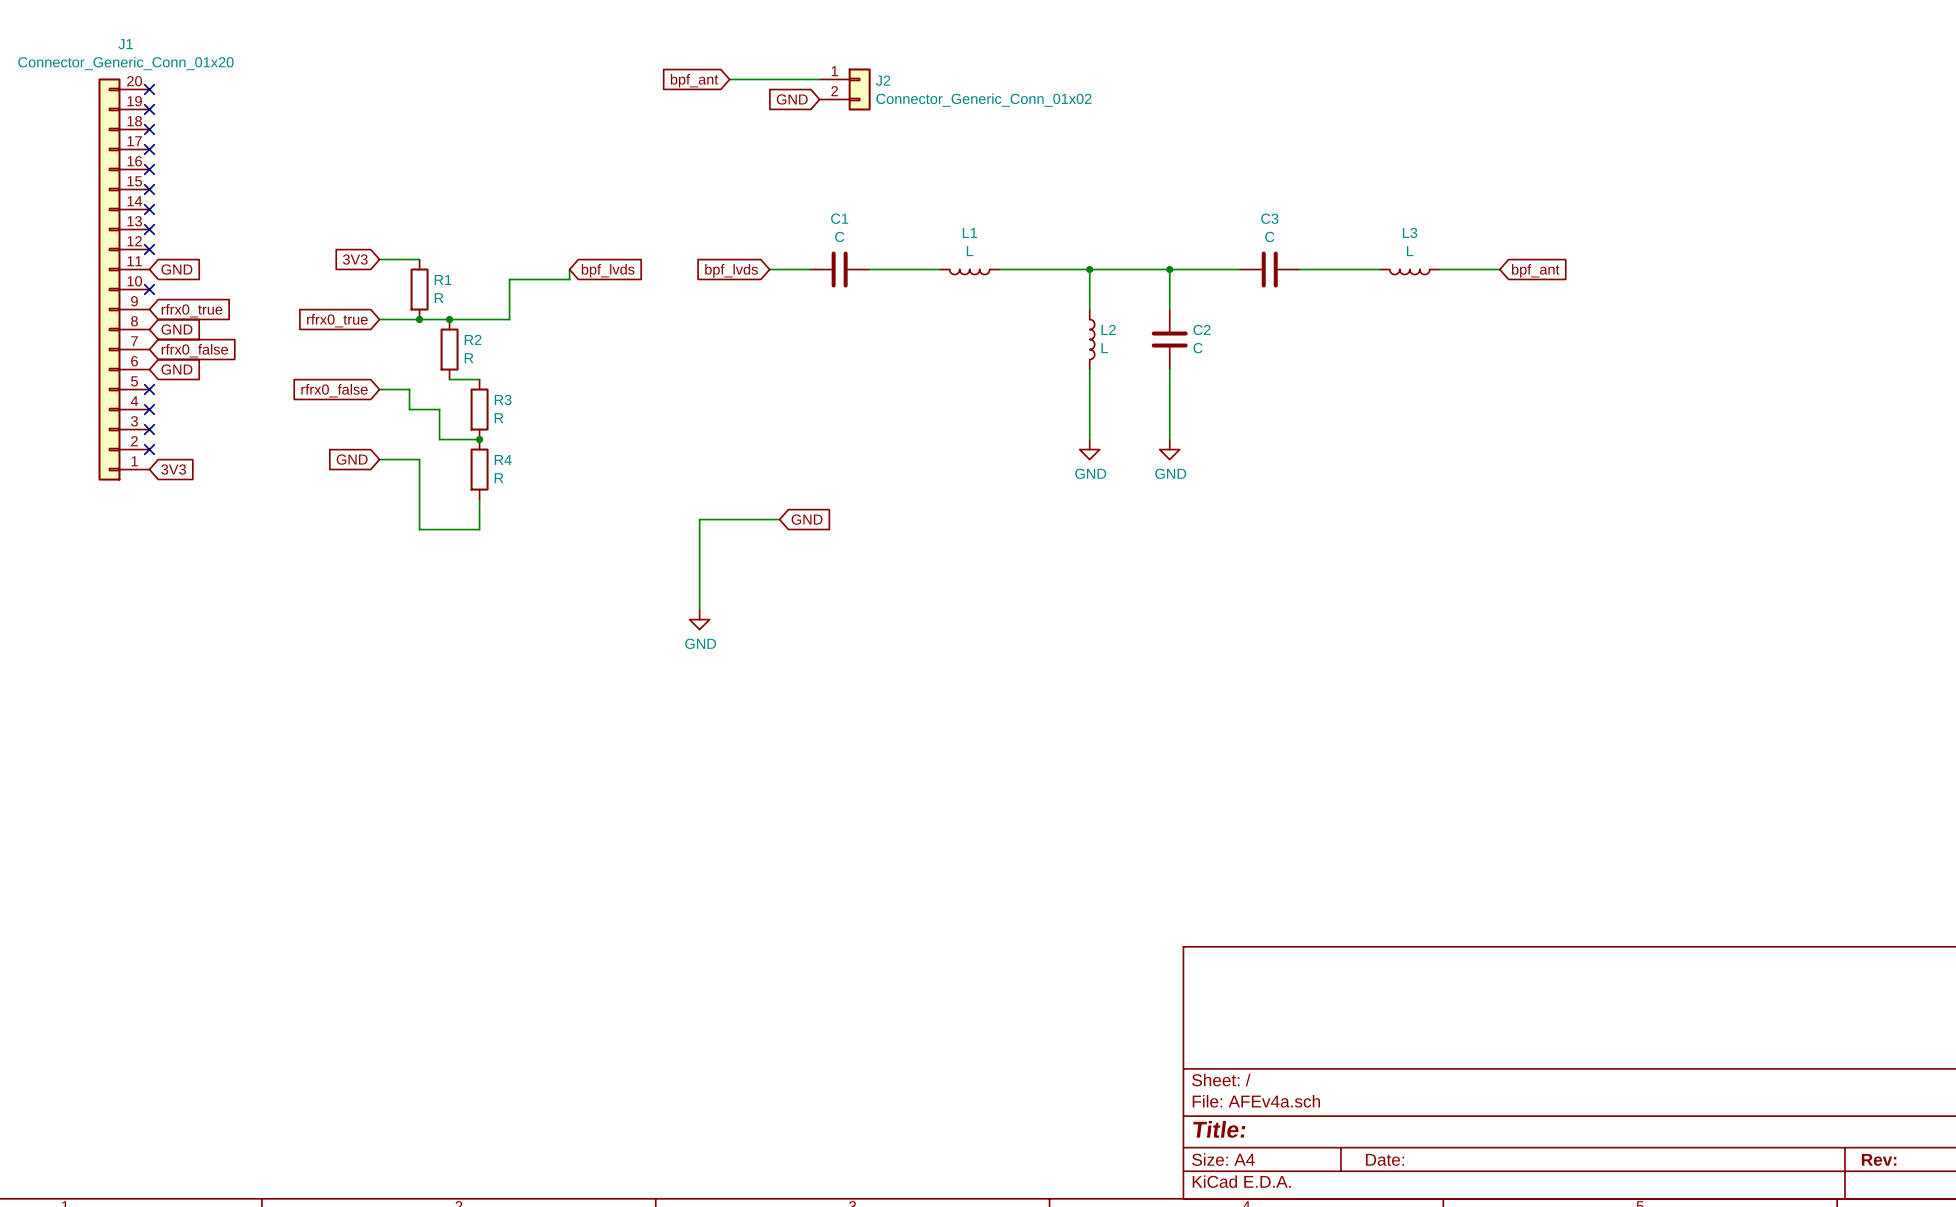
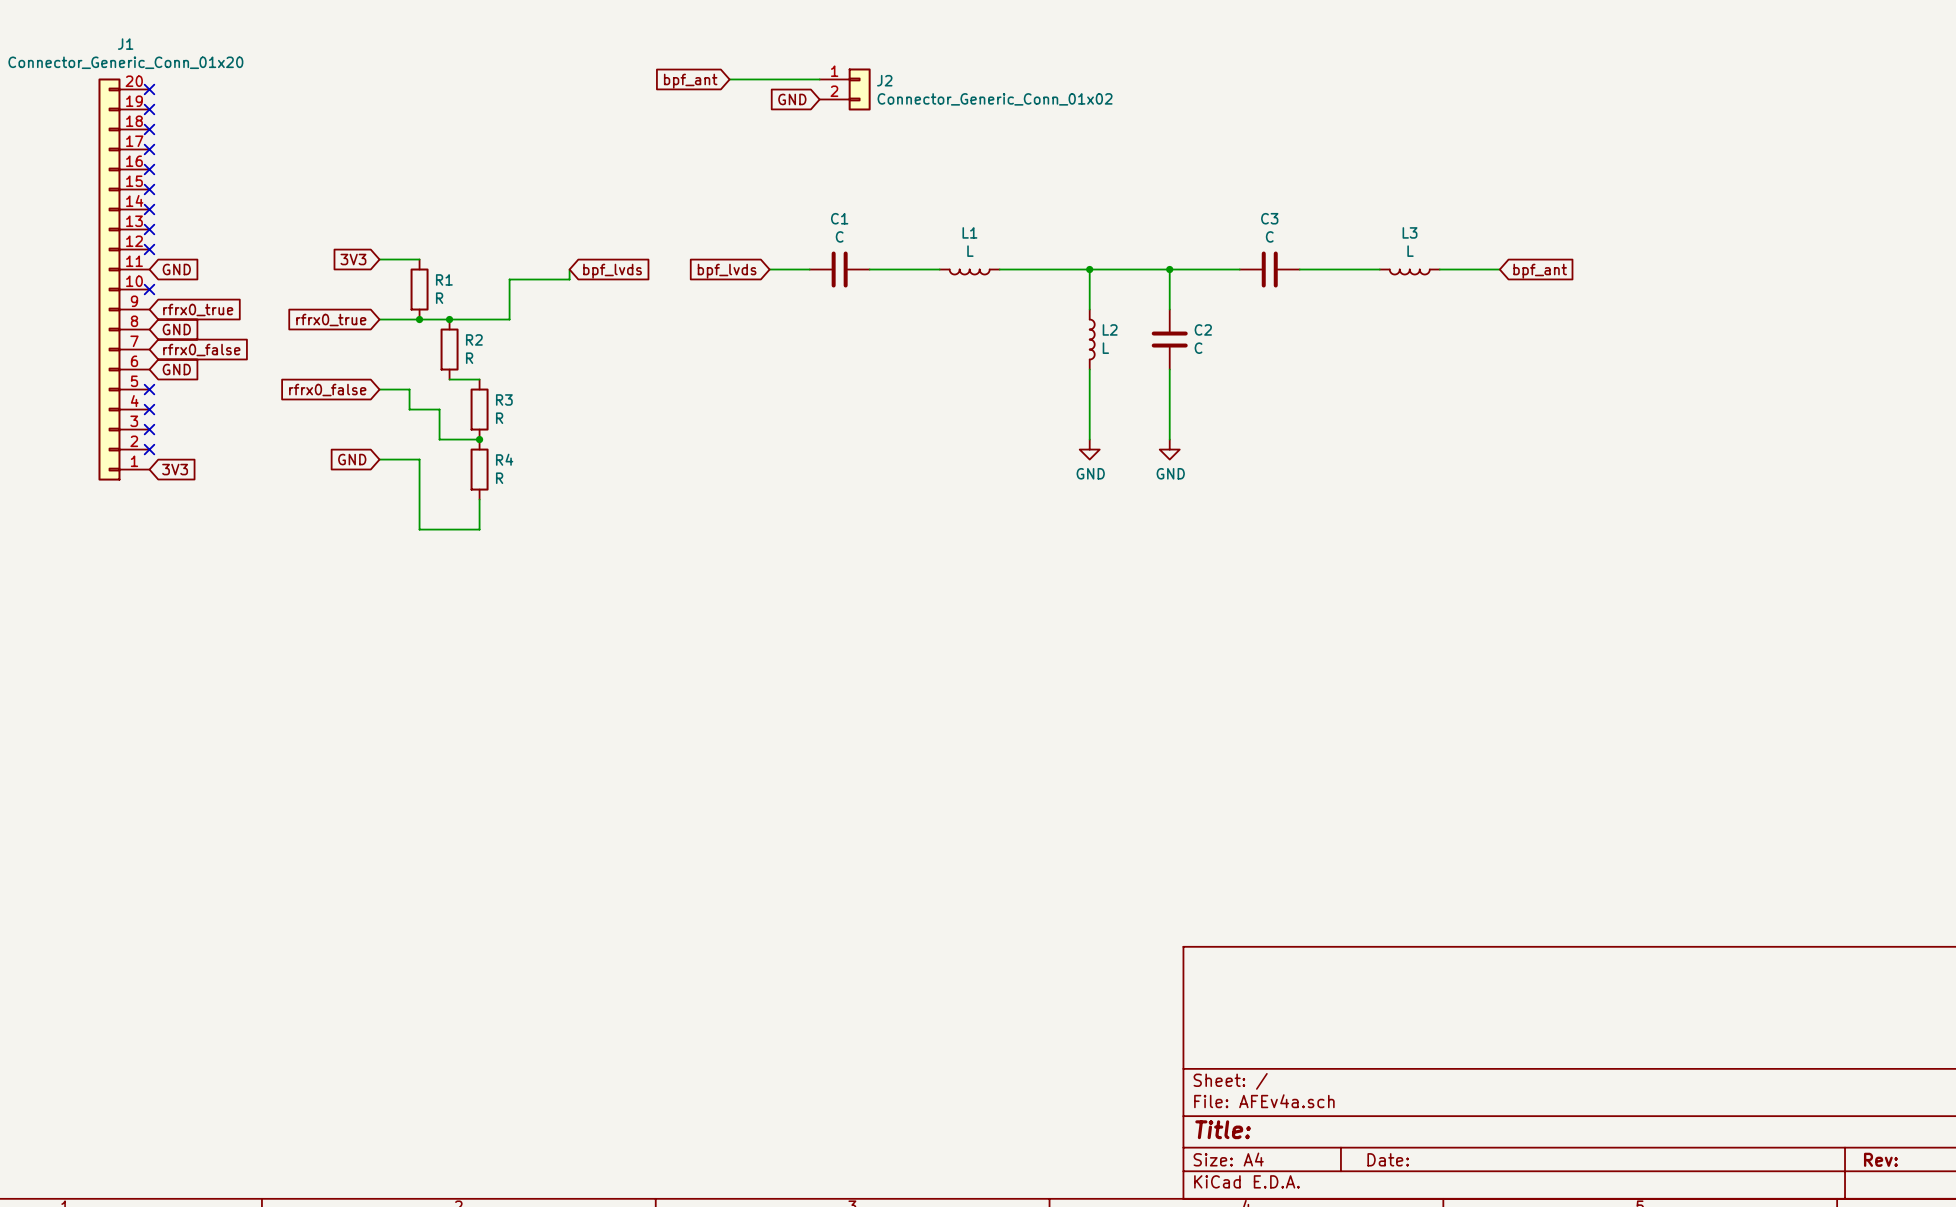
wire: (779, 519) (699, 519) (699, 609) -> none
global label: GND (807, 519) -> none
power symbol: GND (699, 619) -> none

